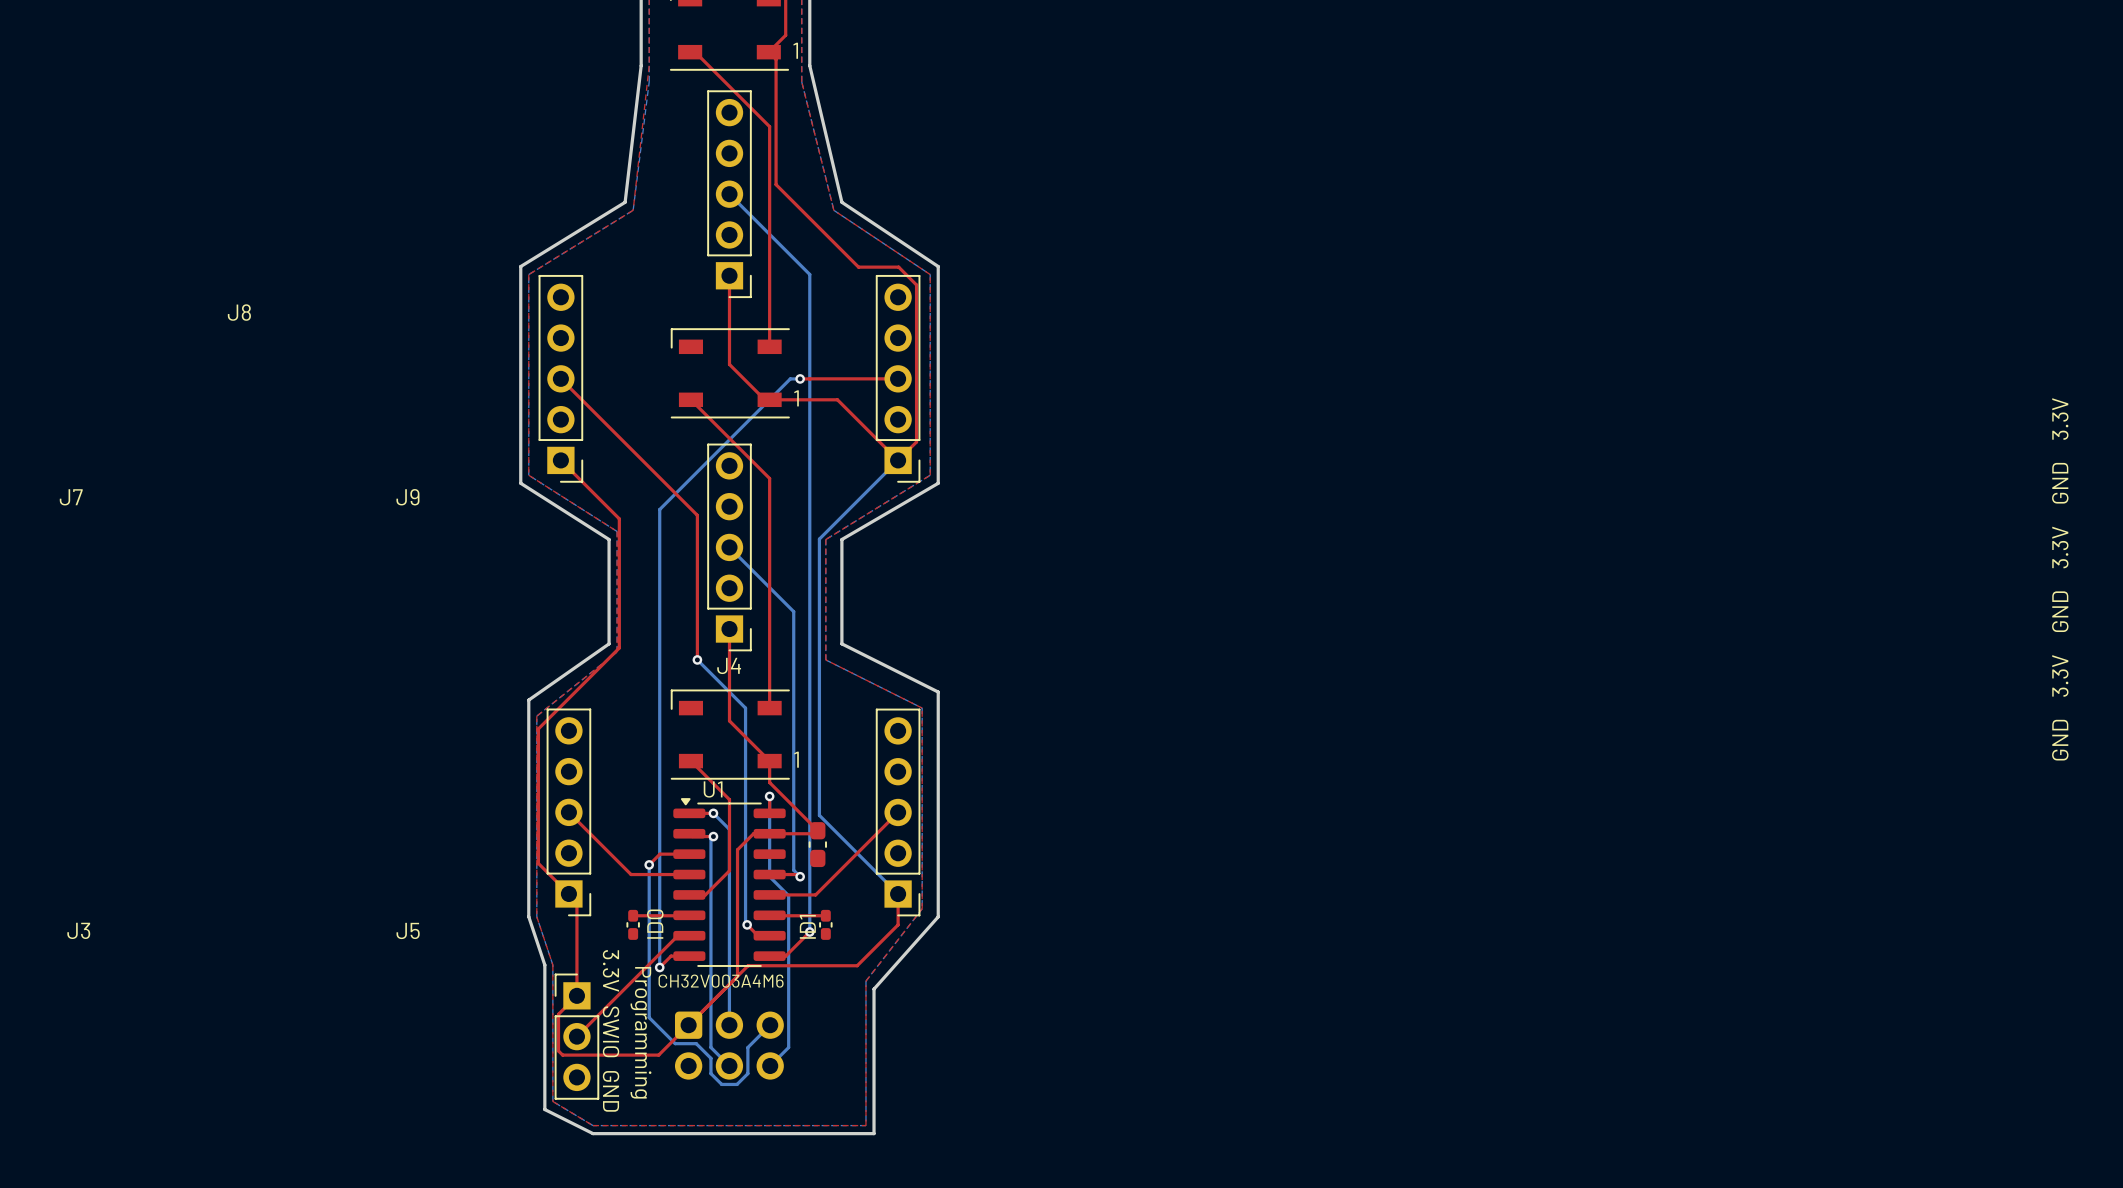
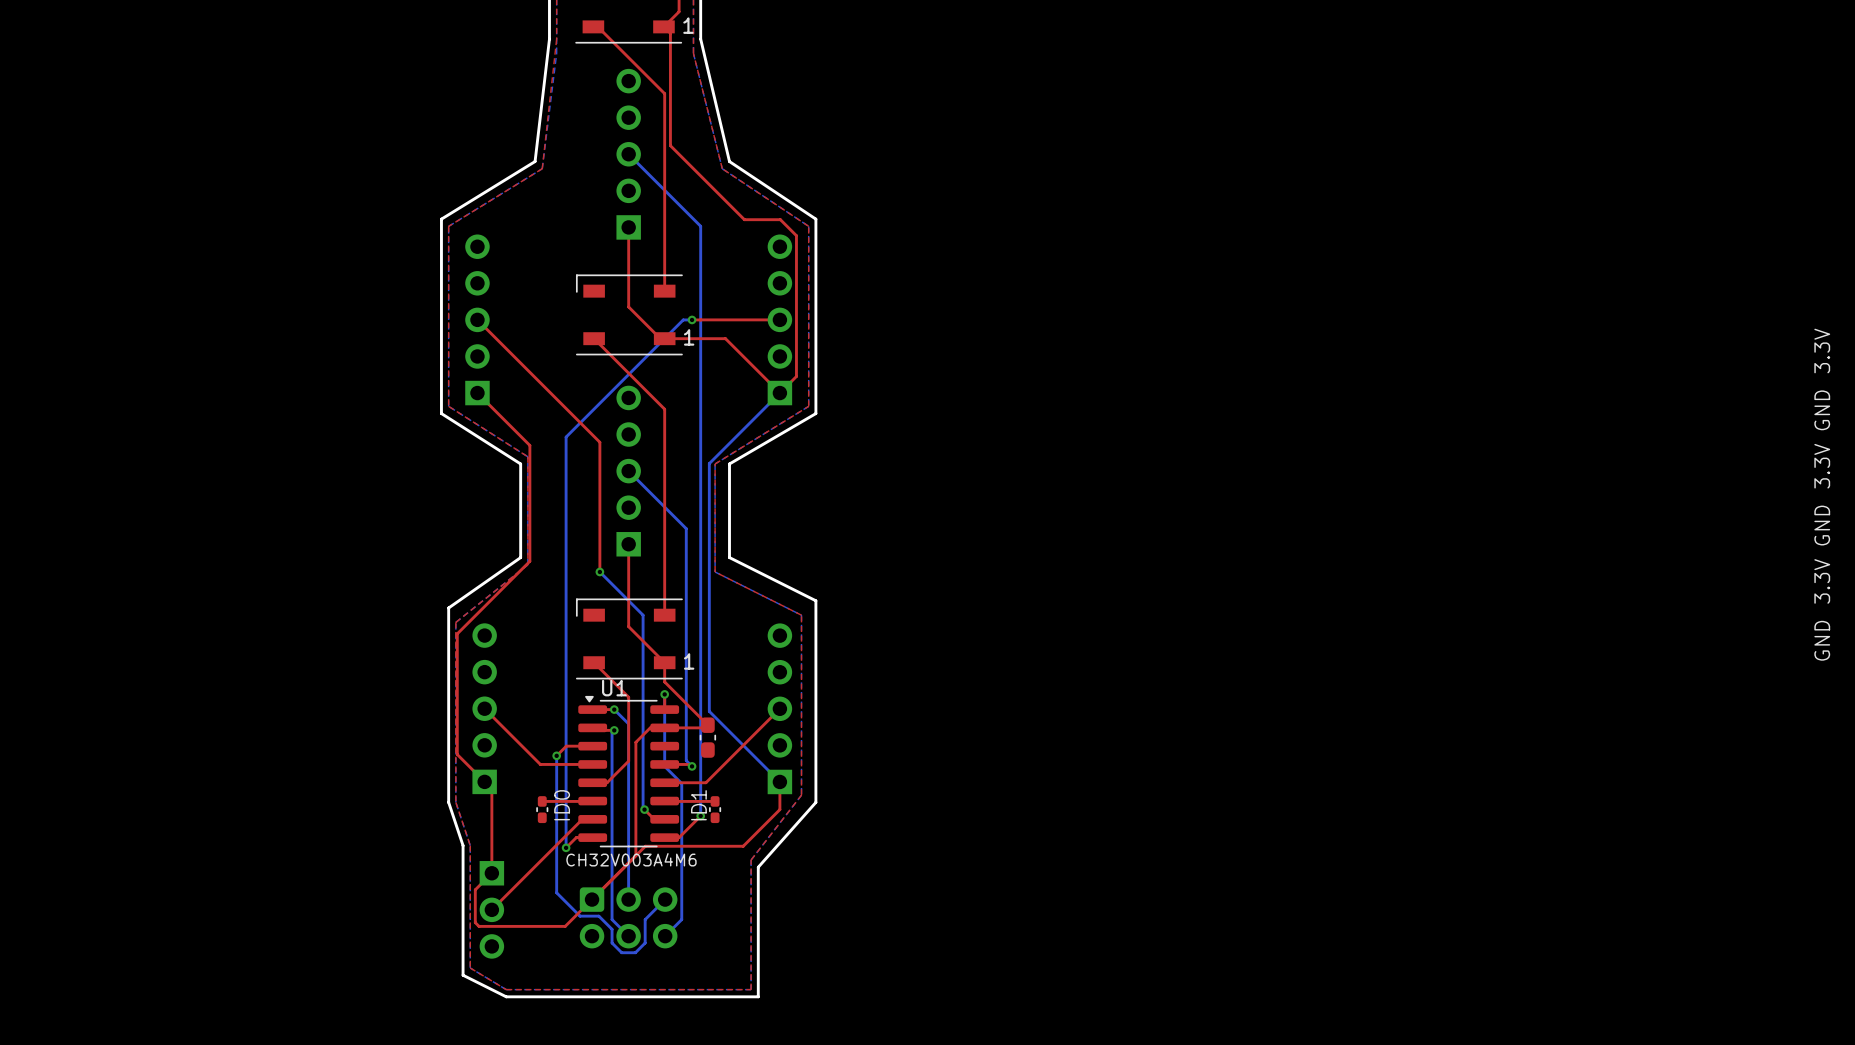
J8 side: top (729, 194) -> bottom (628, 154)
J7 side: top (560, 378) -> bottom (477, 319)
J9 side: top (898, 378) -> bottom (779, 319)
J4 side: top (729, 547) -> bottom (628, 471)
J3 side: top (568, 812) -> bottom (484, 708)
J5 side: top (898, 812) -> bottom (779, 708)
text: 3.3V (610, 970) -> none
text: SWIO (611, 1031) -> none
text: Programming (640, 1032) -> none
part side: top (576, 1036) -> bottom (491, 909)
text: GND (611, 1091) -> none

